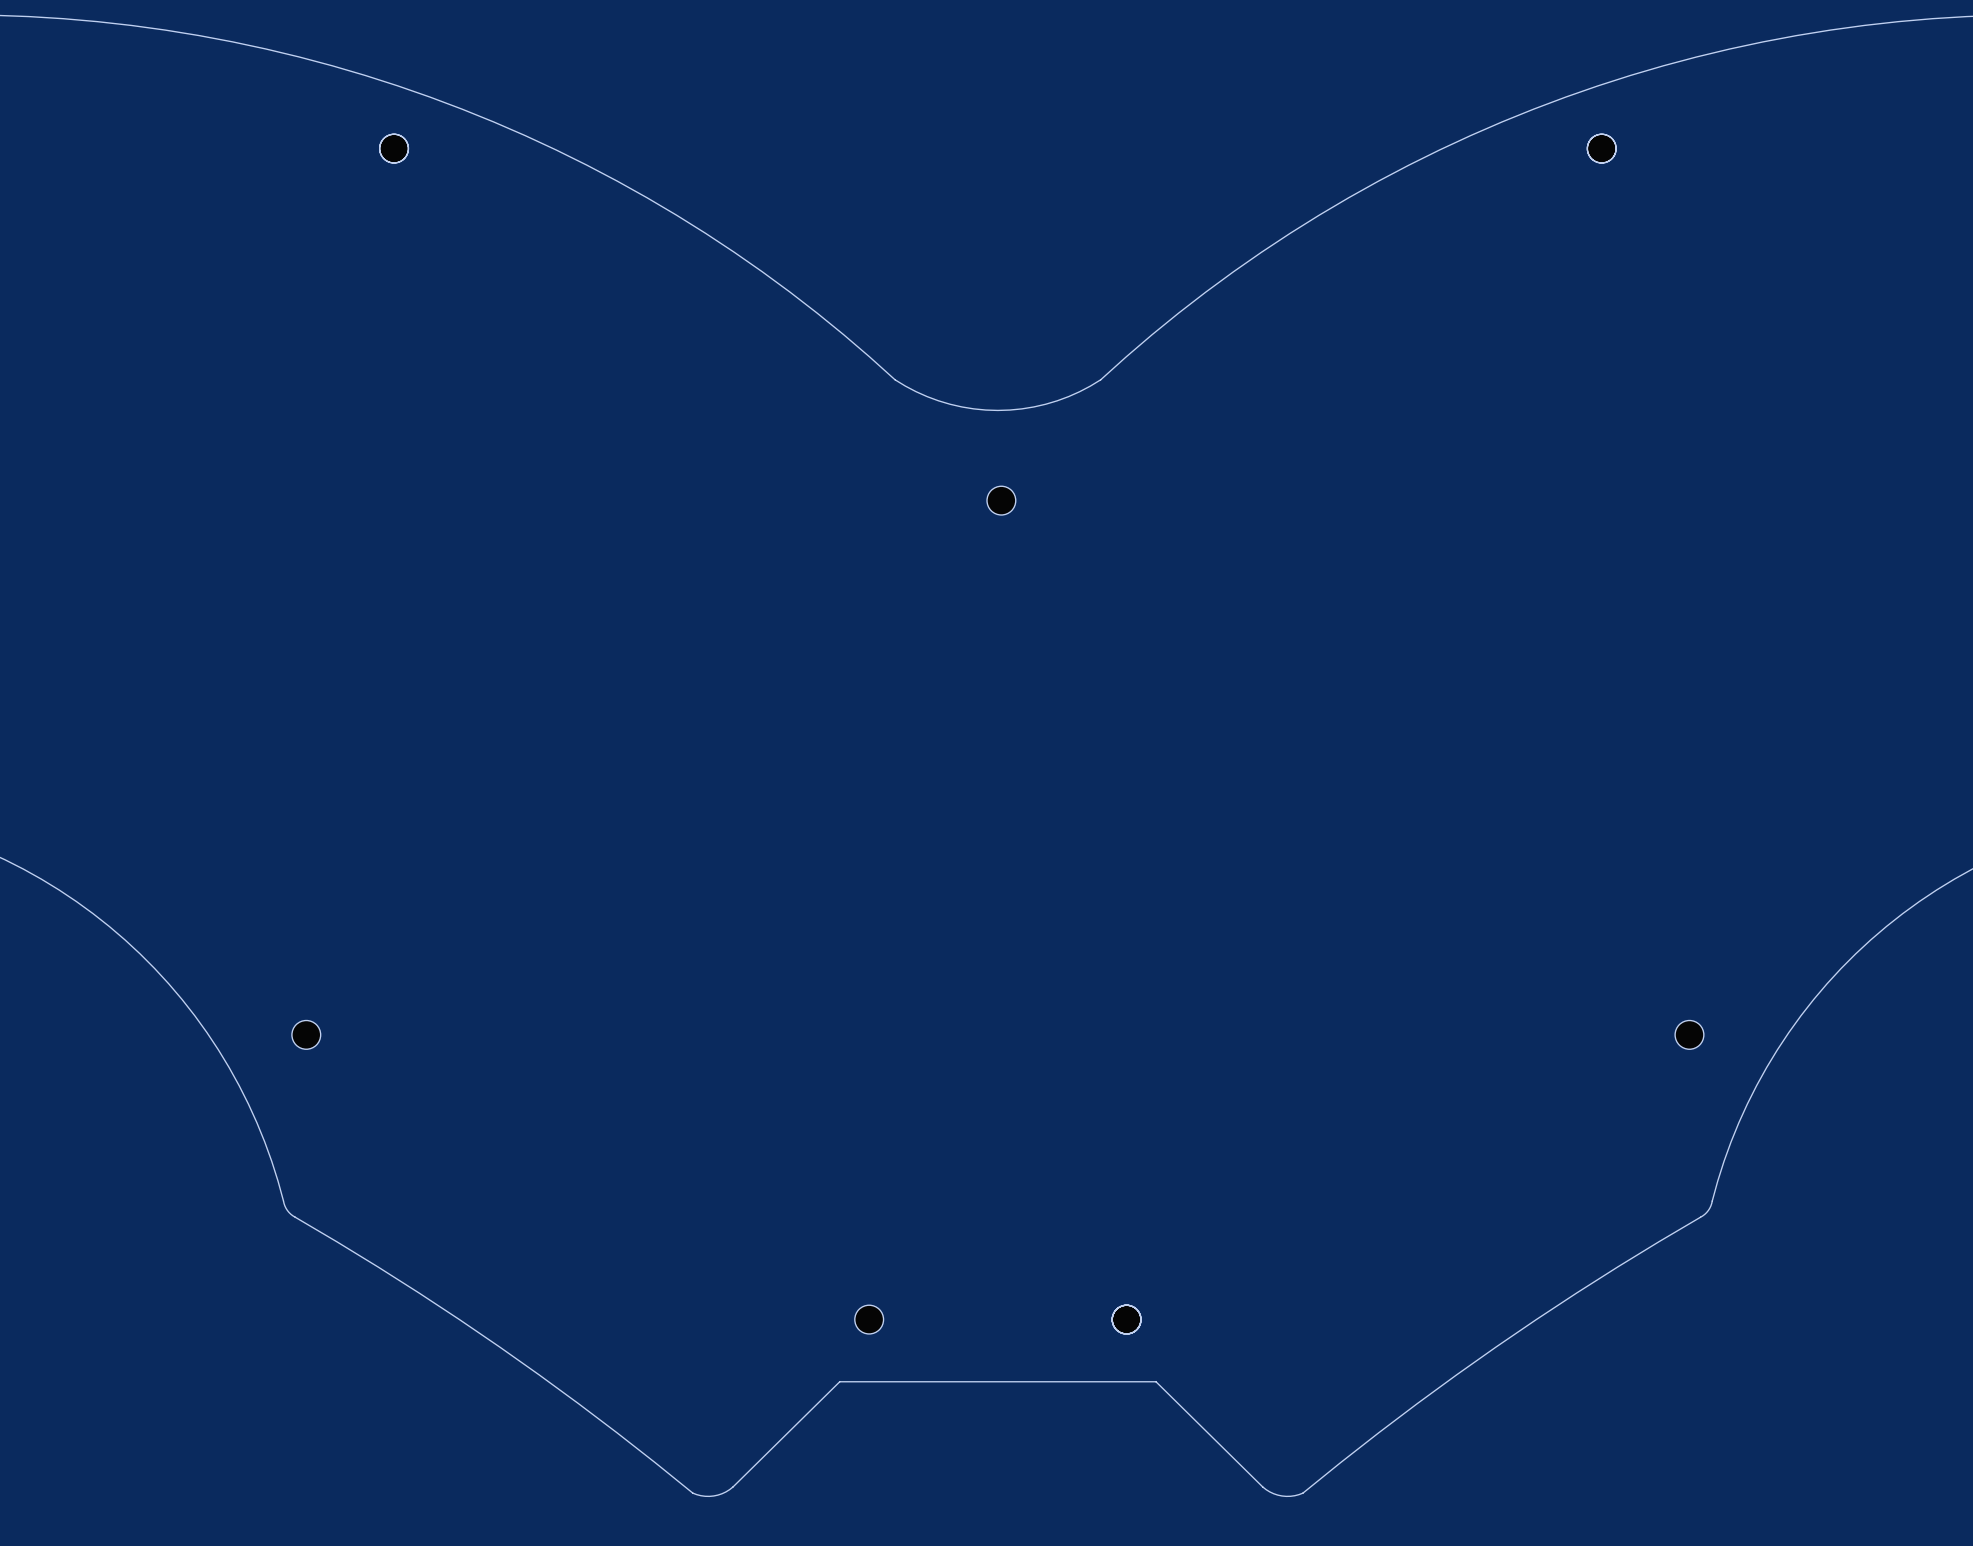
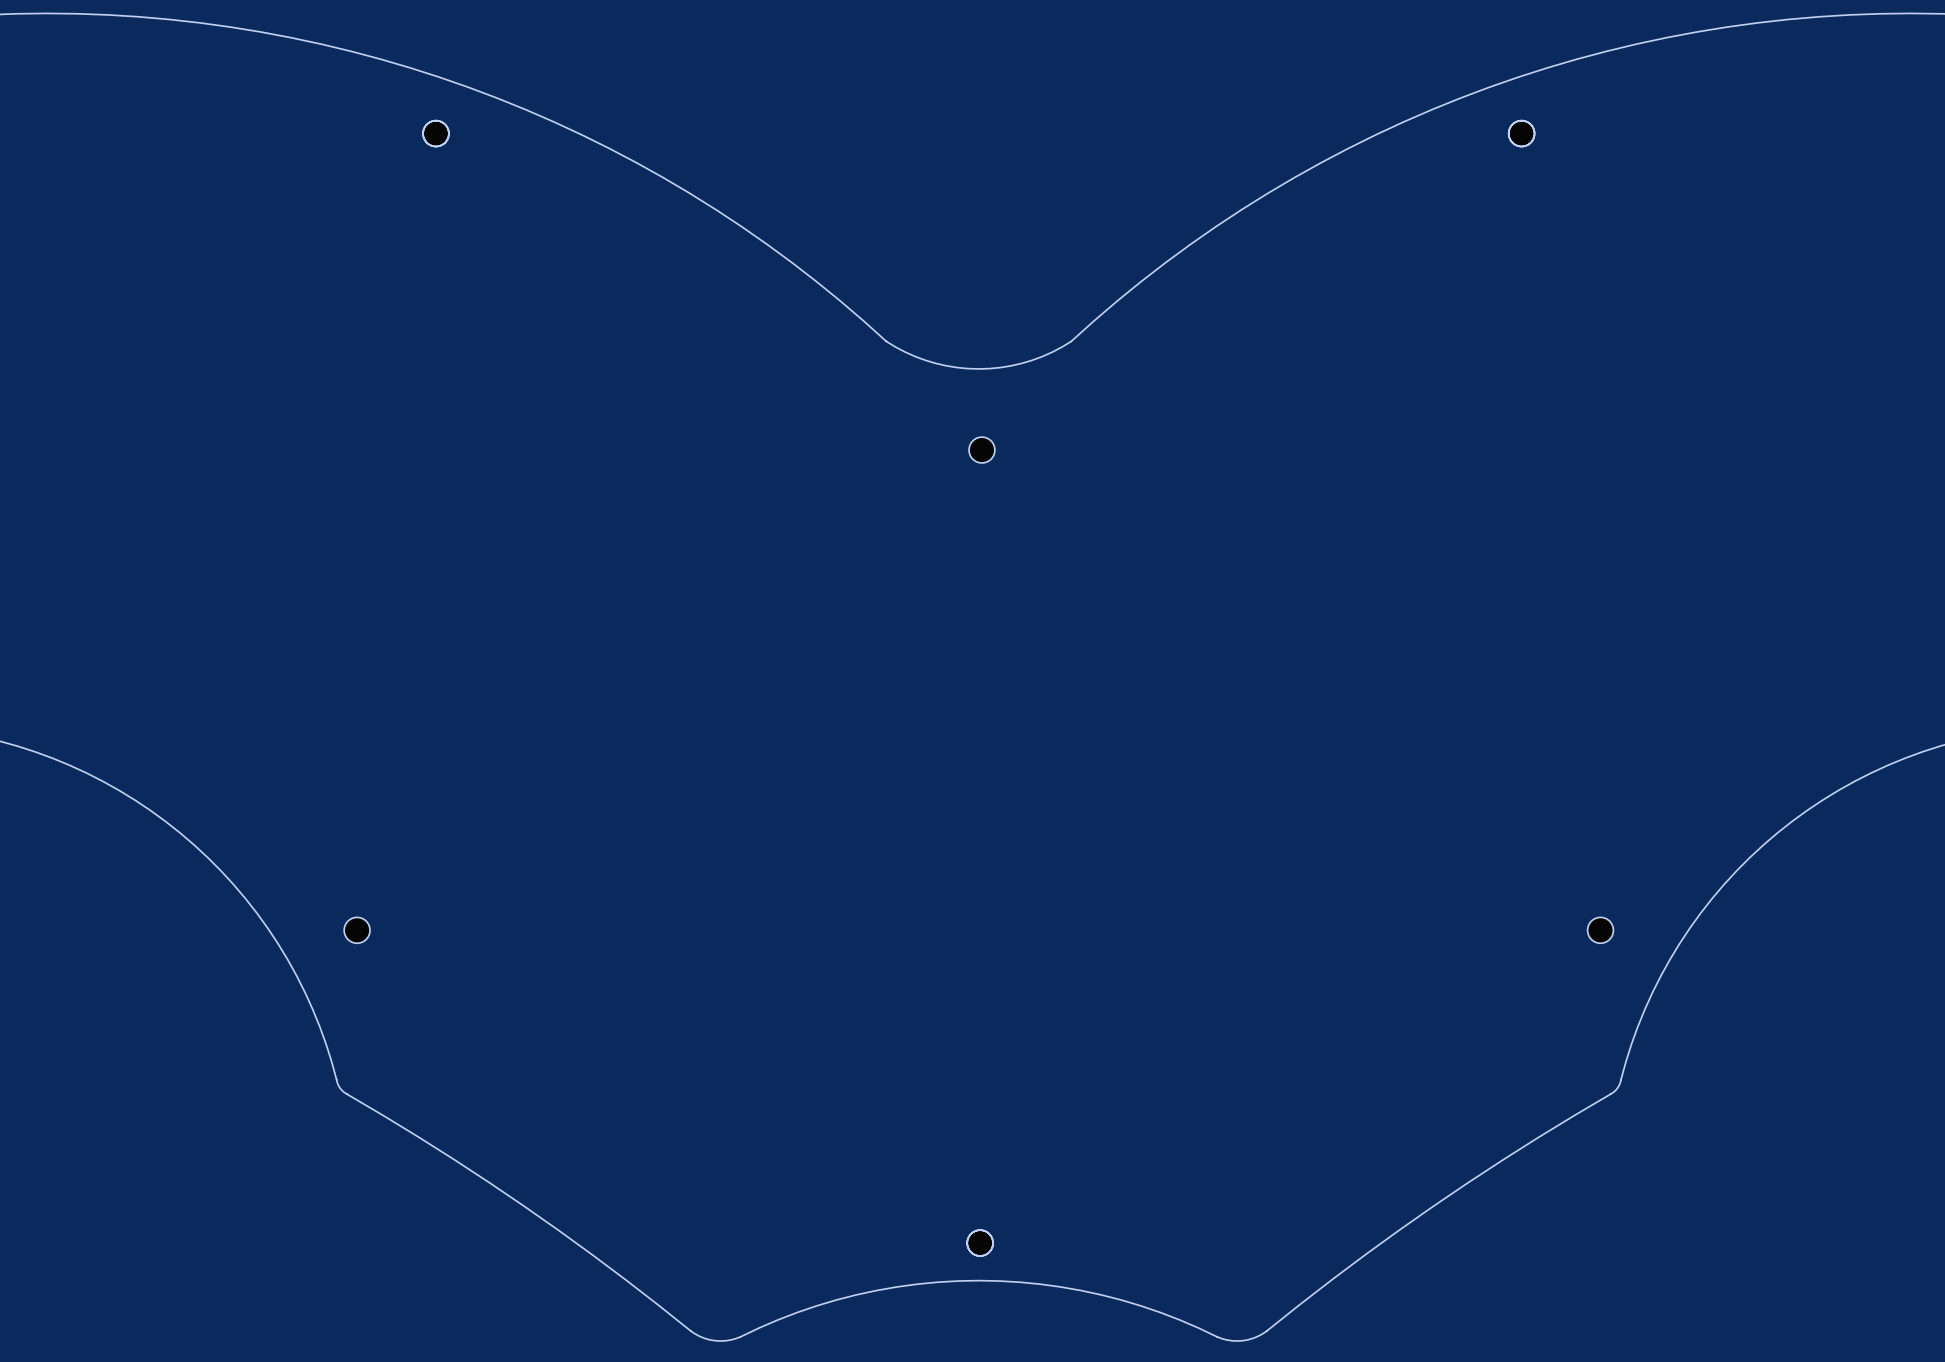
board edge: (295, 1217) (419, 1293) (499, 1347) (578, 1403) (696, 1494) (717, 1495) (732, 1487) (839, 1381) (1156, 1381) (1262, 1487) (1273, 1493) (1286, 1496) (1302, 1493) (1417, 1403) (1536, 1319) (1617, 1267) (1700, 1217) -> (347, 1094) (489, 1182) (591, 1254) (690, 1330) (709, 1339) (725, 1340) (735, 1338) (797, 1312) (856, 1294) (917, 1284) (978, 1280) (1040, 1284) (1101, 1294) (1160, 1312) (1221, 1338) (1237, 1341) (1247, 1339) (1262, 1333) (1365, 1254) (1434, 1205) (1538, 1137) (1610, 1094)
part: (869, 1319) -> none
part: (1126, 1319) -> none
part: none -> (980, 1243)

